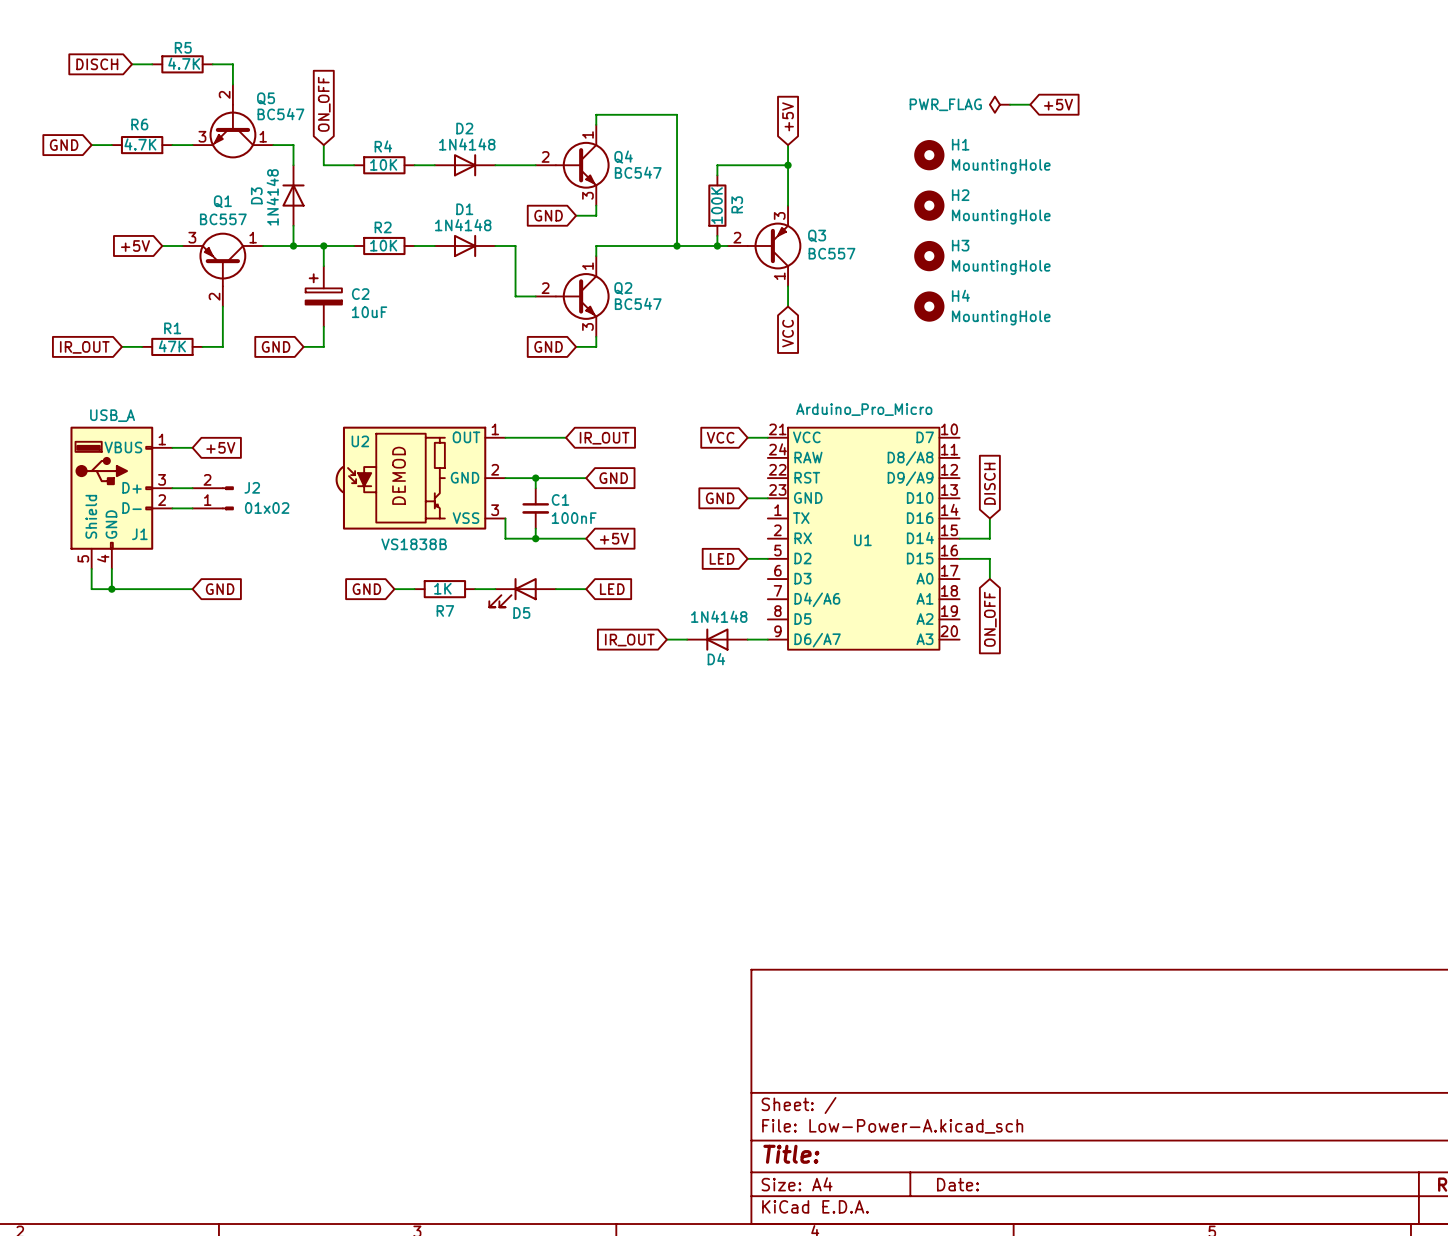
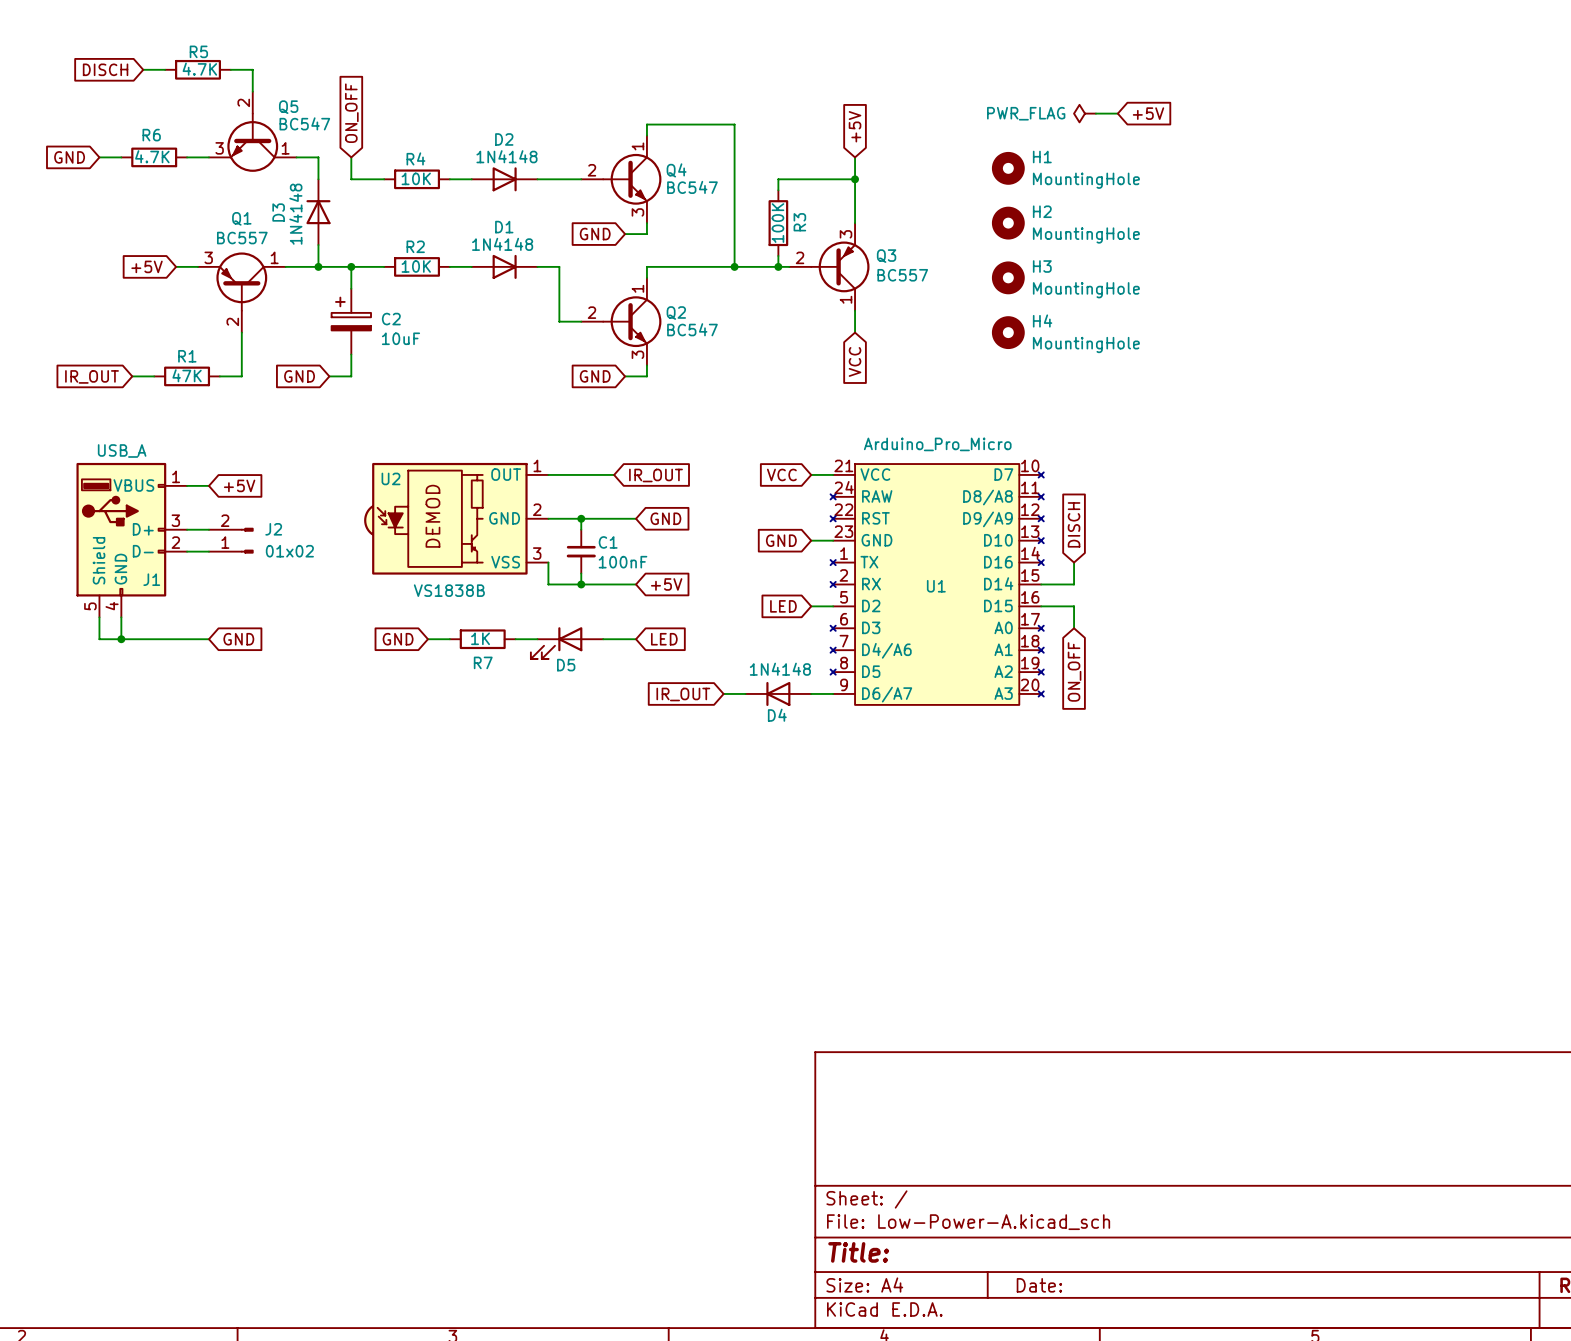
U1 symbol: [767, 427, 960, 650] -> [830, 464, 1044, 705]

